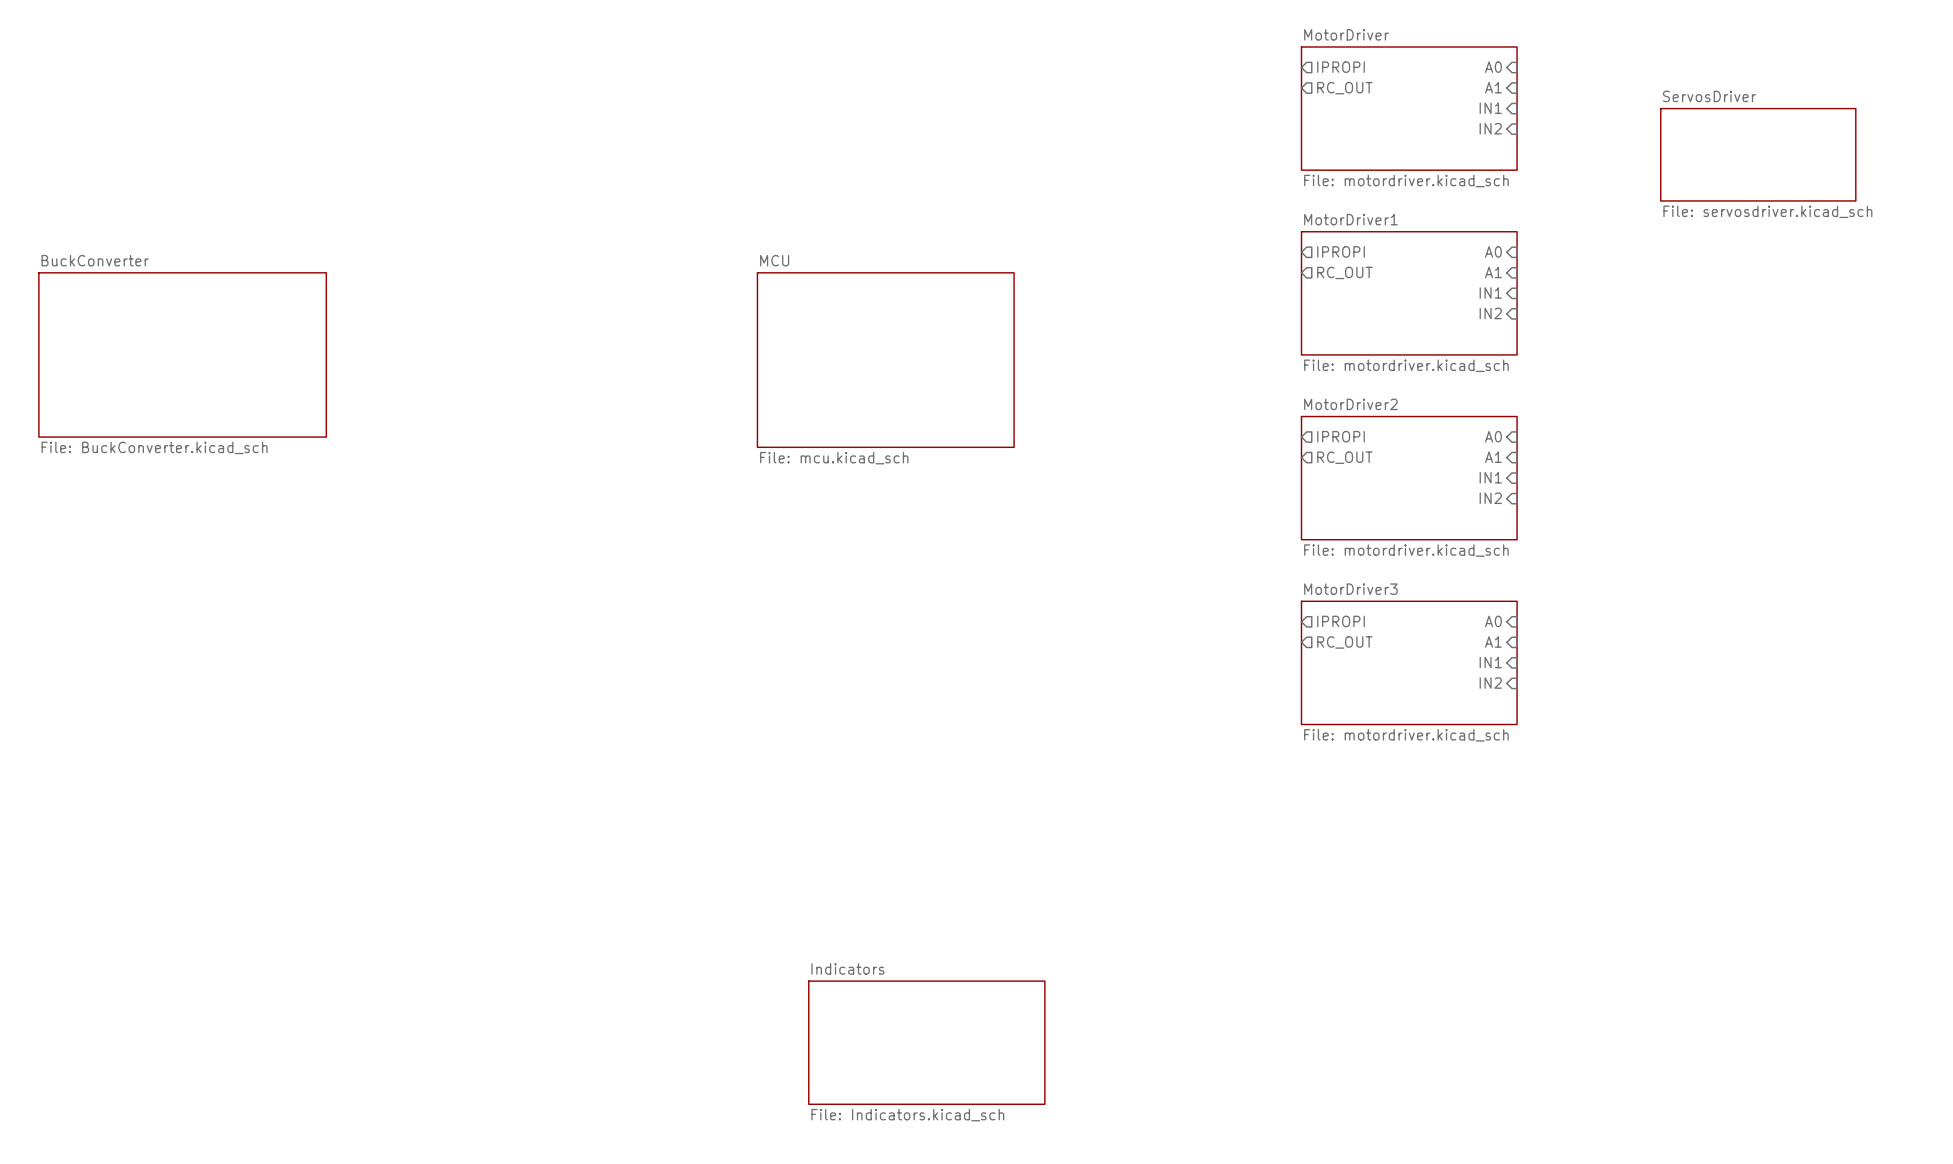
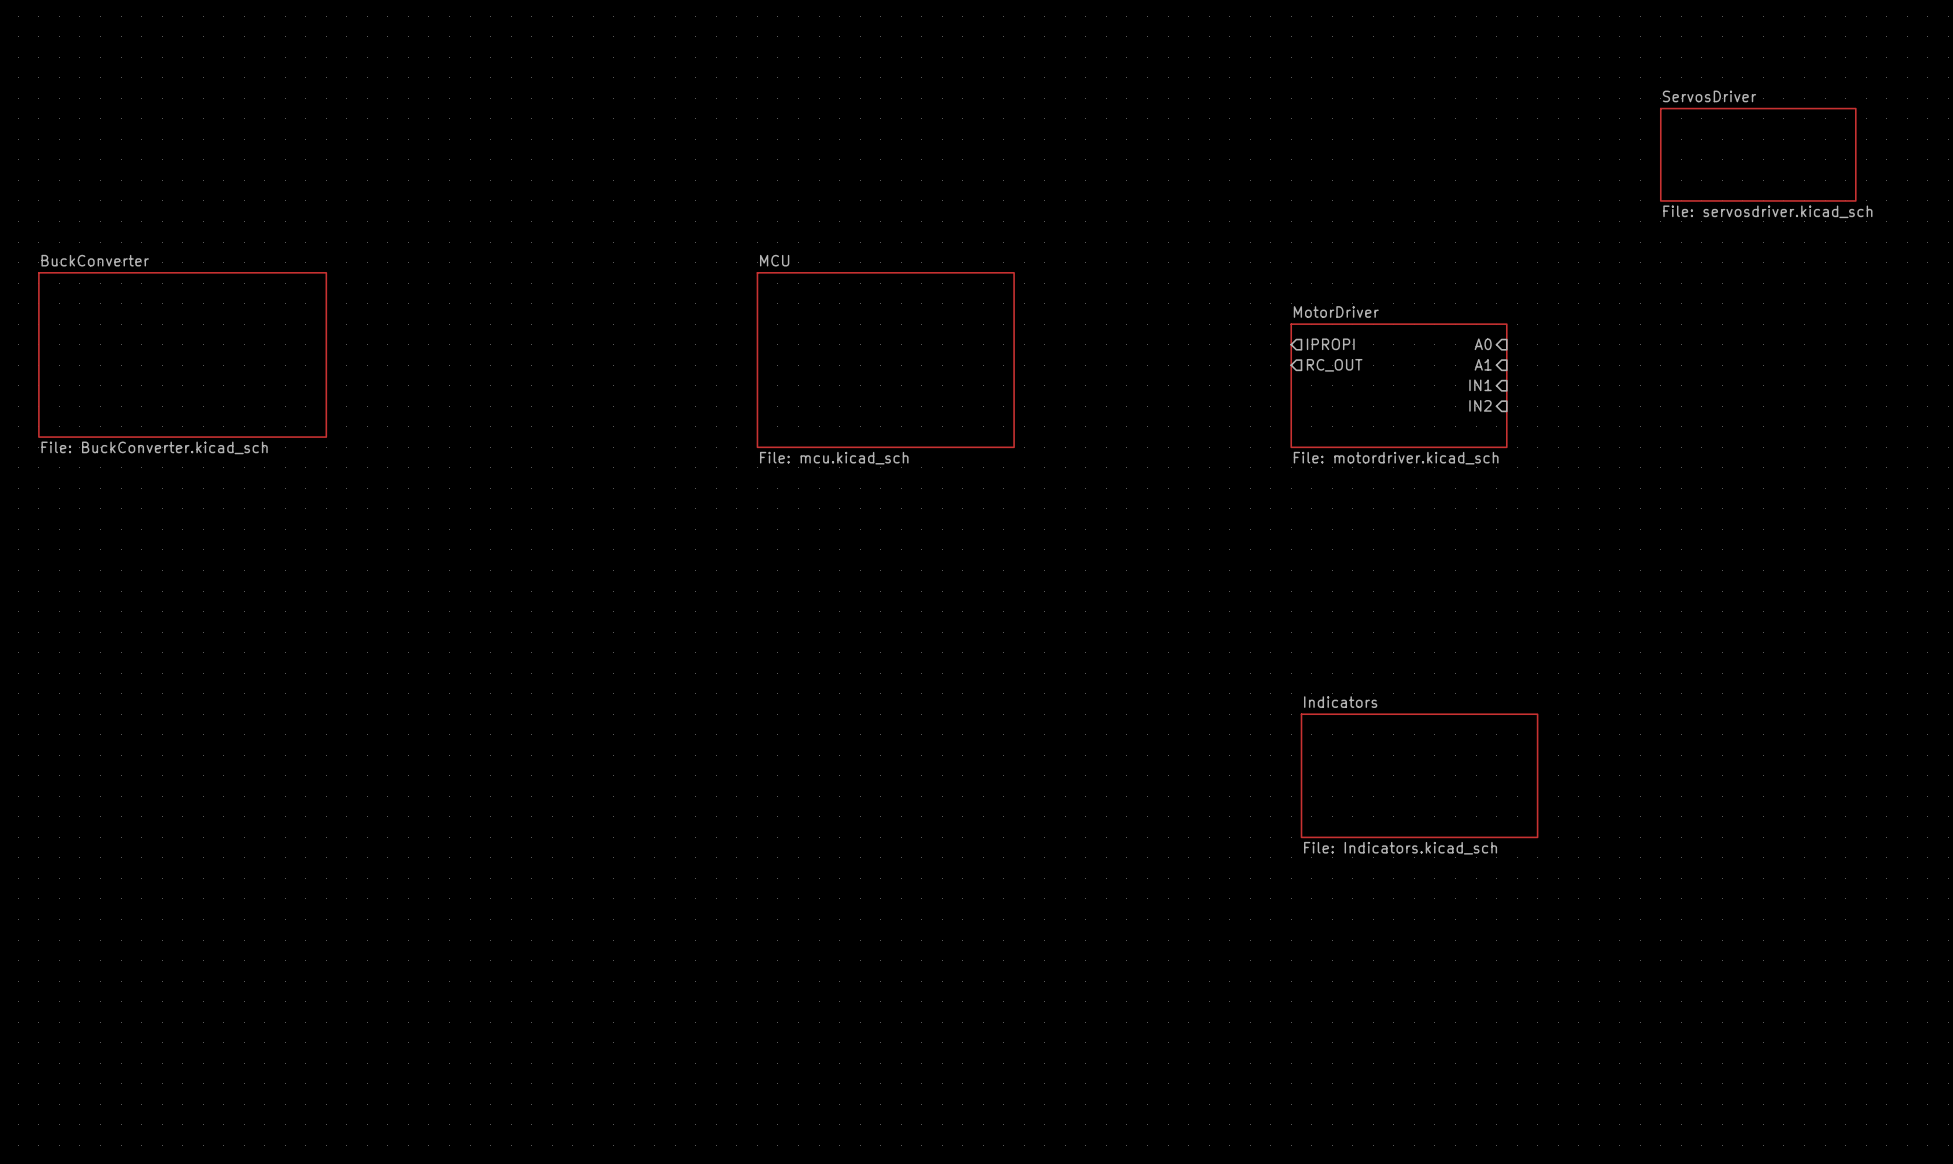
sheet pin: IPROPI (1341, 67) -> none
sheet pin: A0 (1493, 67) -> none
sheet pin: A1 (1493, 87) -> none
sheet pin: RC_OUT (1344, 88) -> none
sheet MotorDriver: File: motordriver.kicad_sch (1409, 108) -> none
sheet pin: IN1 (1490, 108) -> none
sheet pin: IN2 (1490, 128) -> none
sheet pin: IPROPI (1341, 251) -> none
sheet pin: A0 (1493, 251) -> none
sheet pin: RC_OUT (1344, 272) -> none
sheet pin: A1 (1493, 272) -> none
sheet pin: IN1 (1490, 292) -> none
sheet MotorDriver1: File: motordriver.kicad_sch (1409, 293) -> none
sheet pin: IN2 (1490, 313) -> none
sheet pin: none -> IPROPI (1330, 344)
sheet pin: none -> A0 (1483, 344)
sheet pin: none -> A1 (1483, 364)
sheet pin: none -> RC_OUT (1334, 365)
sheet MotorDriver: none -> File: motordriver.kicad_sch (1399, 385)
sheet pin: none -> IN1 (1480, 385)
sheet pin: none -> IN2 (1480, 405)
sheet pin: IPROPI (1341, 436) -> none
sheet pin: A0 (1493, 436) -> none
sheet pin: RC_OUT (1344, 457) -> none
sheet pin: A1 (1493, 457) -> none
sheet pin: IN1 (1490, 477) -> none
sheet MotorDriver2: File: motordriver.kicad_sch (1409, 478) -> none
sheet pin: IN2 (1490, 498) -> none
sheet pin: IPROPI (1341, 621) -> none
sheet pin: A0 (1493, 621) -> none
sheet pin: A1 (1493, 641) -> none
sheet pin: RC_OUT (1344, 642) -> none
sheet MotorDriver3: File: motordriver.kicad_sch (1409, 662) -> none
sheet pin: IN1 (1490, 662) -> none
sheet pin: IN2 (1490, 683) -> none
sheet Indicators: none -> File: Indicators.kicad_sch (1419, 775)
sheet Indicators: File: Indicators.kicad_sch (926, 1042) -> none

